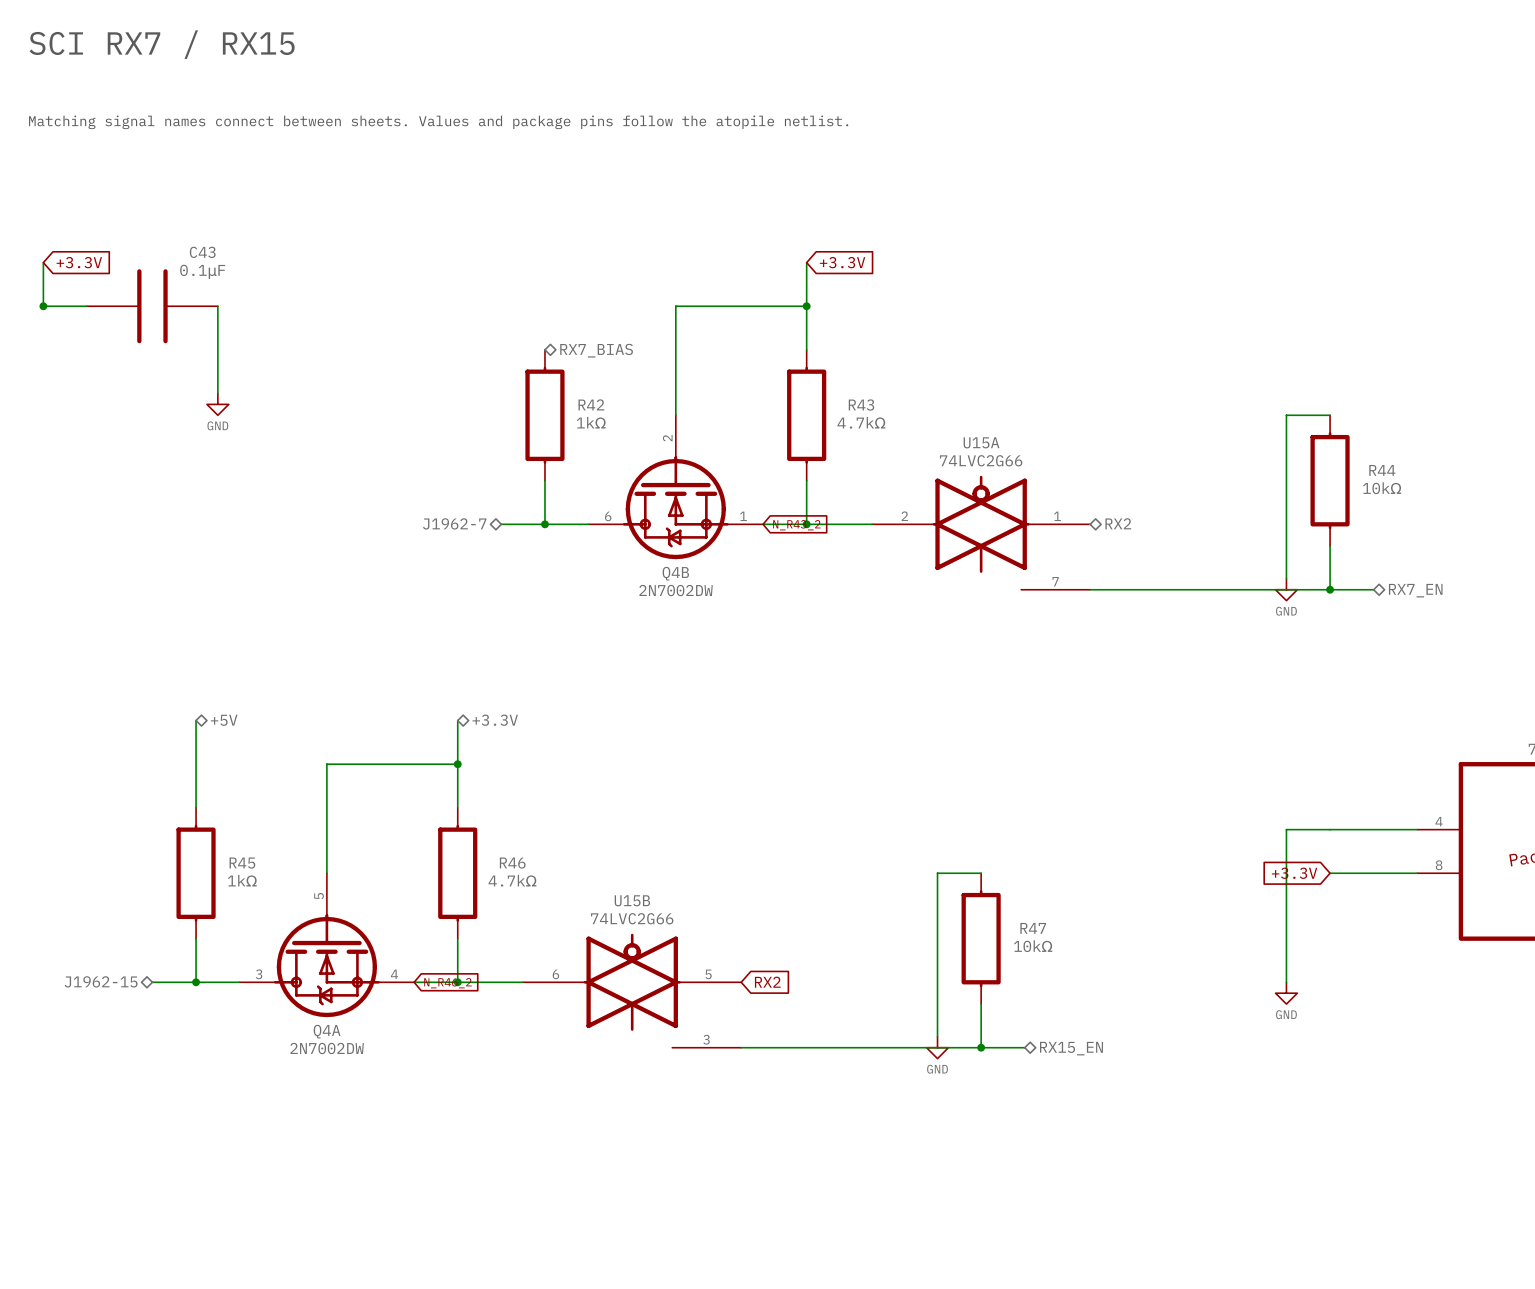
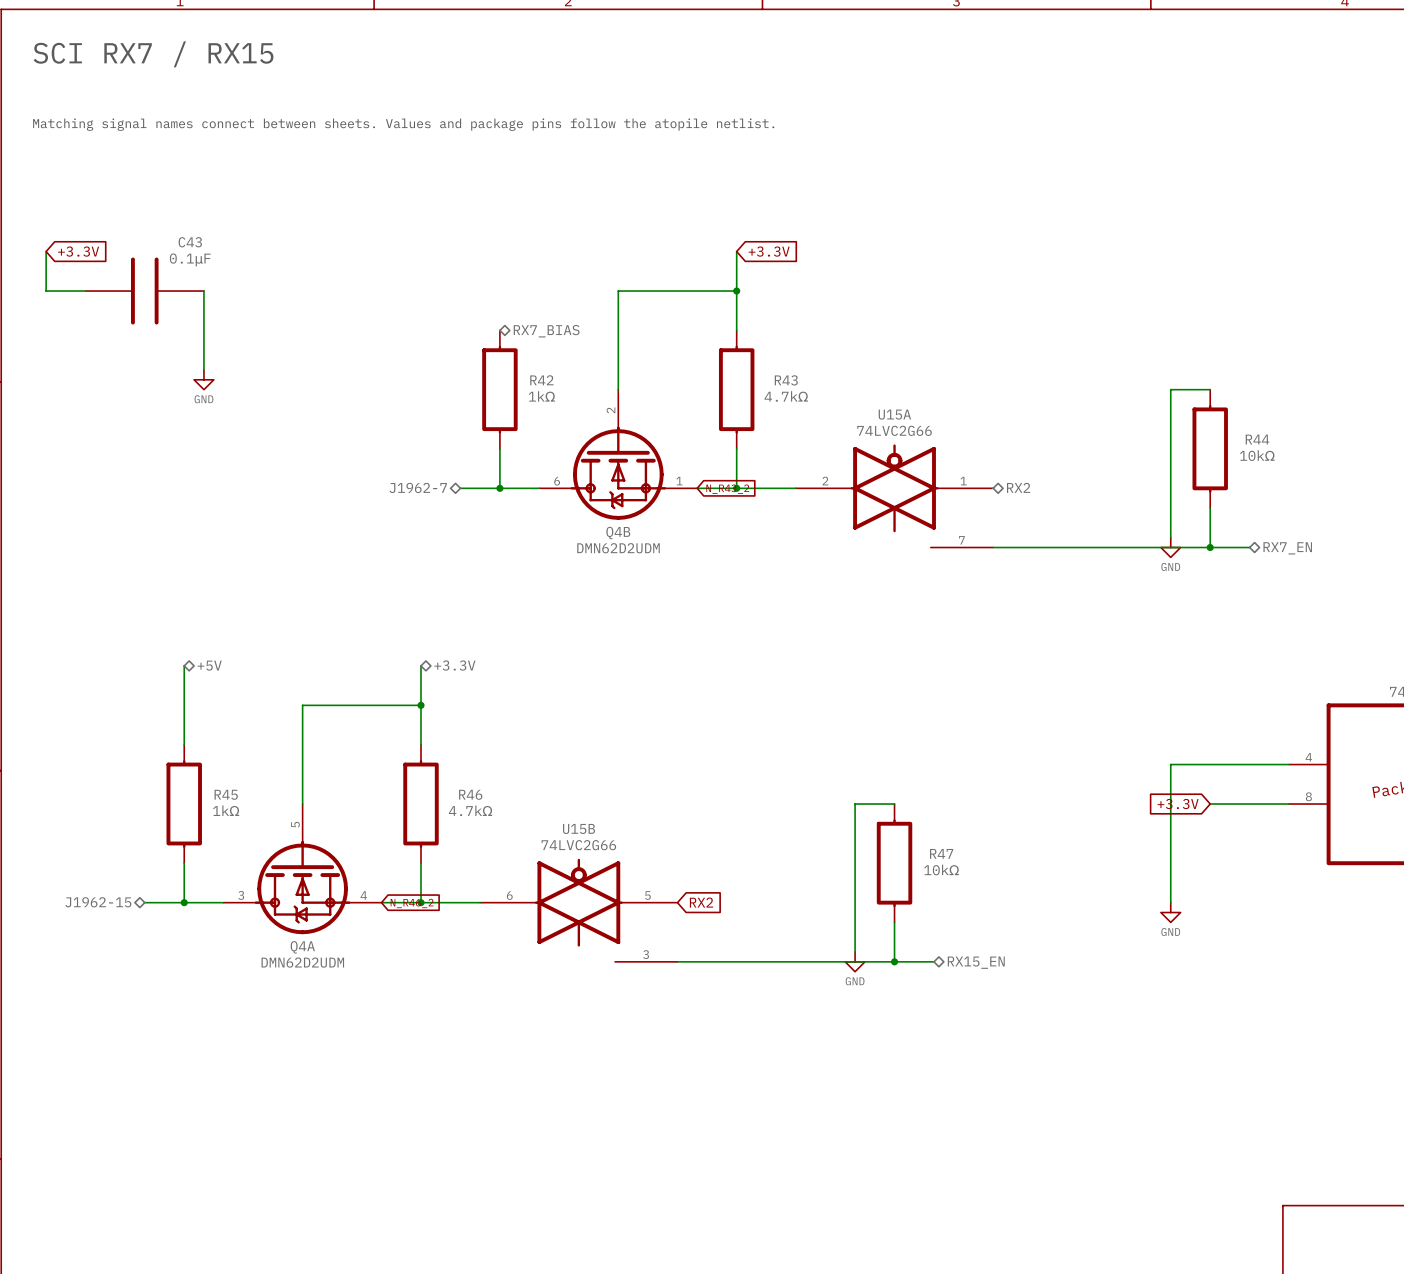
junction: (43, 306) -> none
Q4B value: 2N7002DW (676, 590) -> DMN62D2UDM (618, 548)
Q4A value: 2N7002DW (327, 1048) -> DMN62D2UDM (302, 962)

